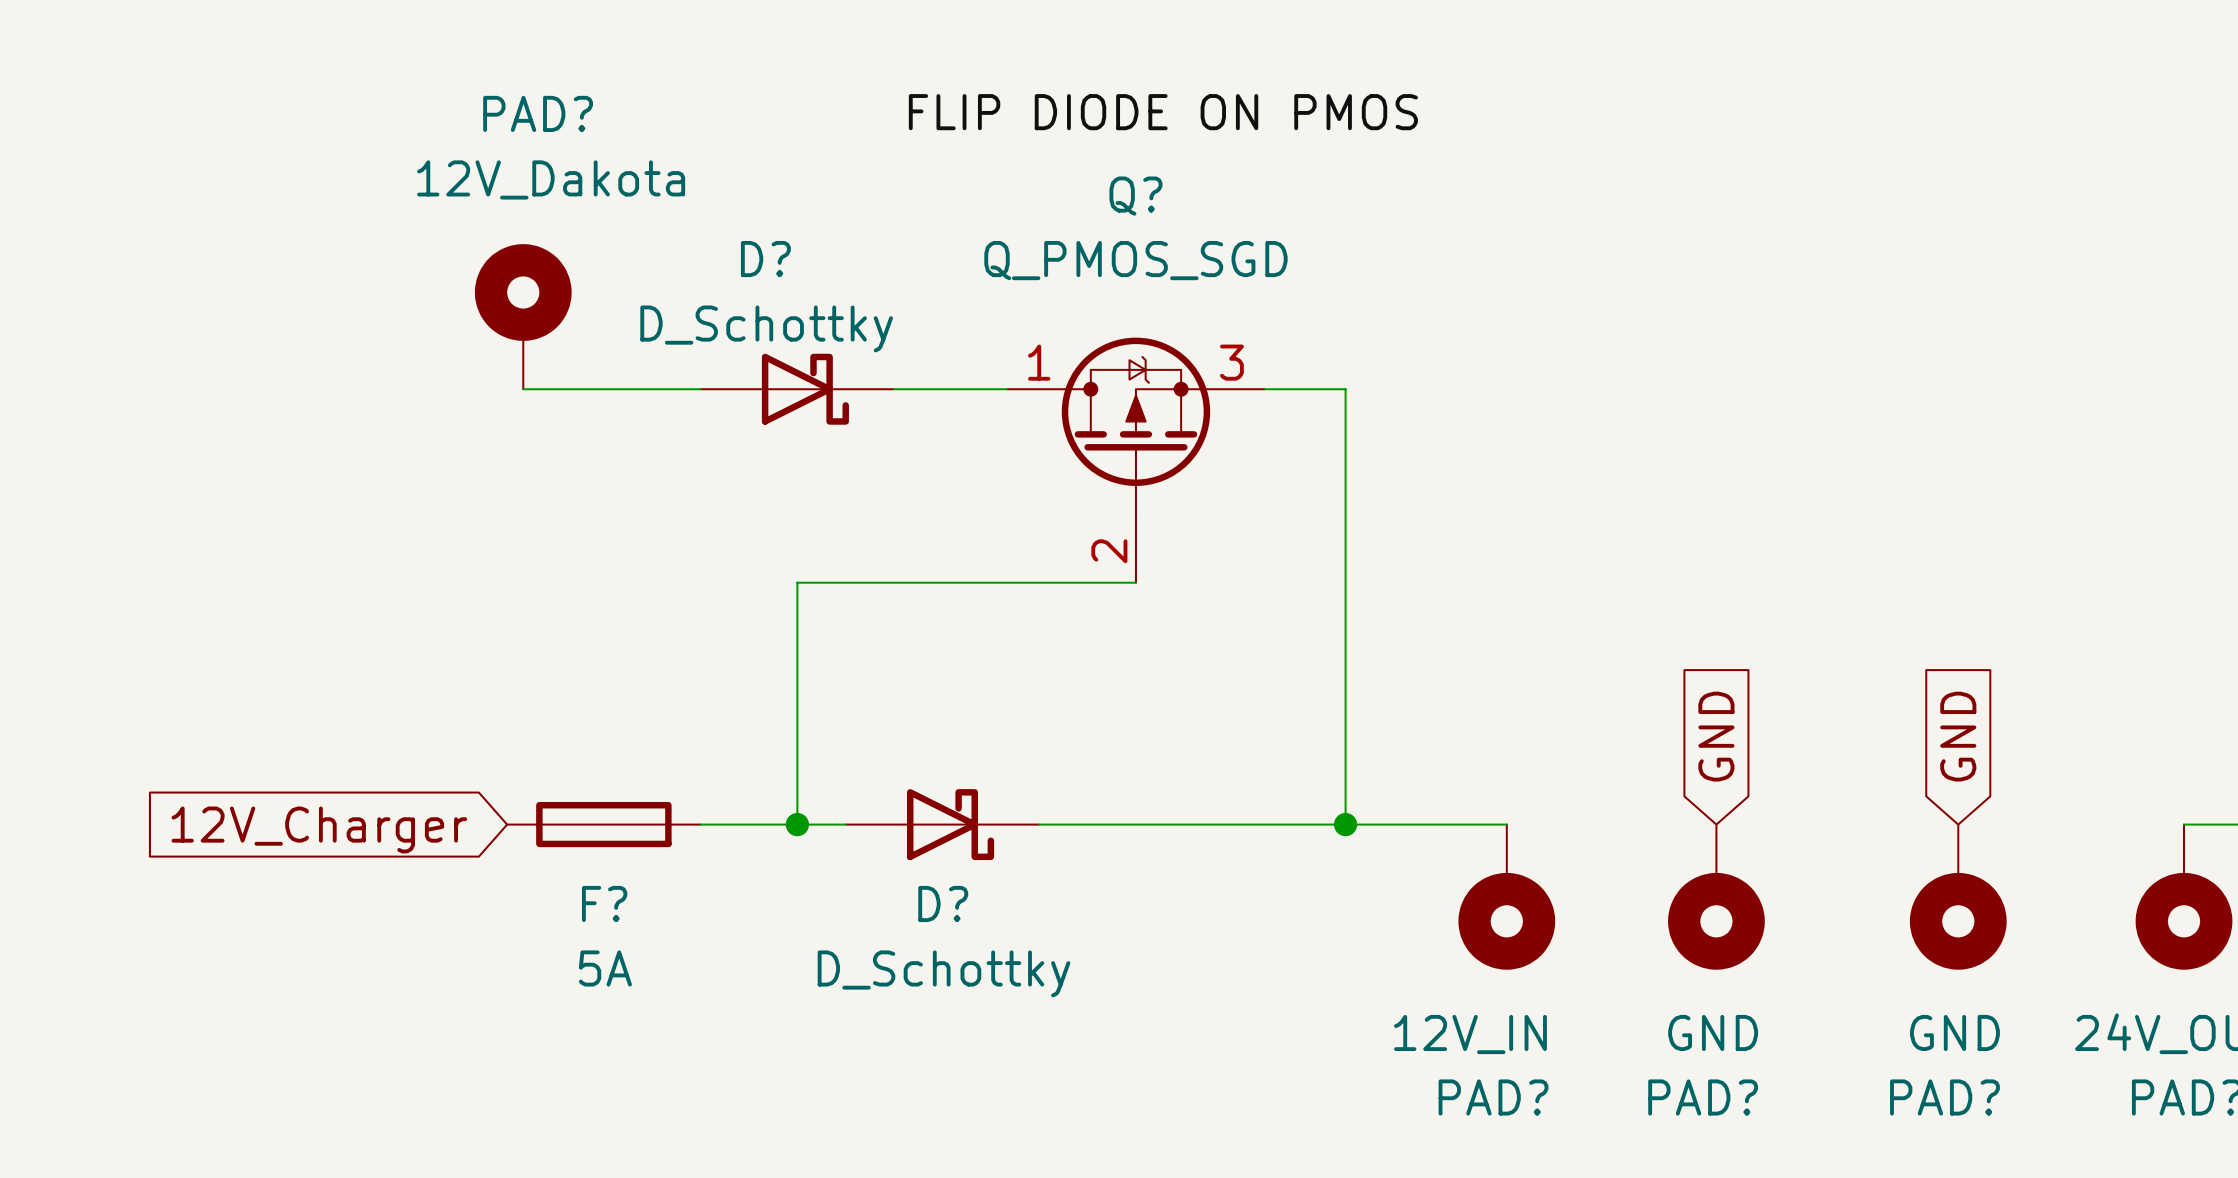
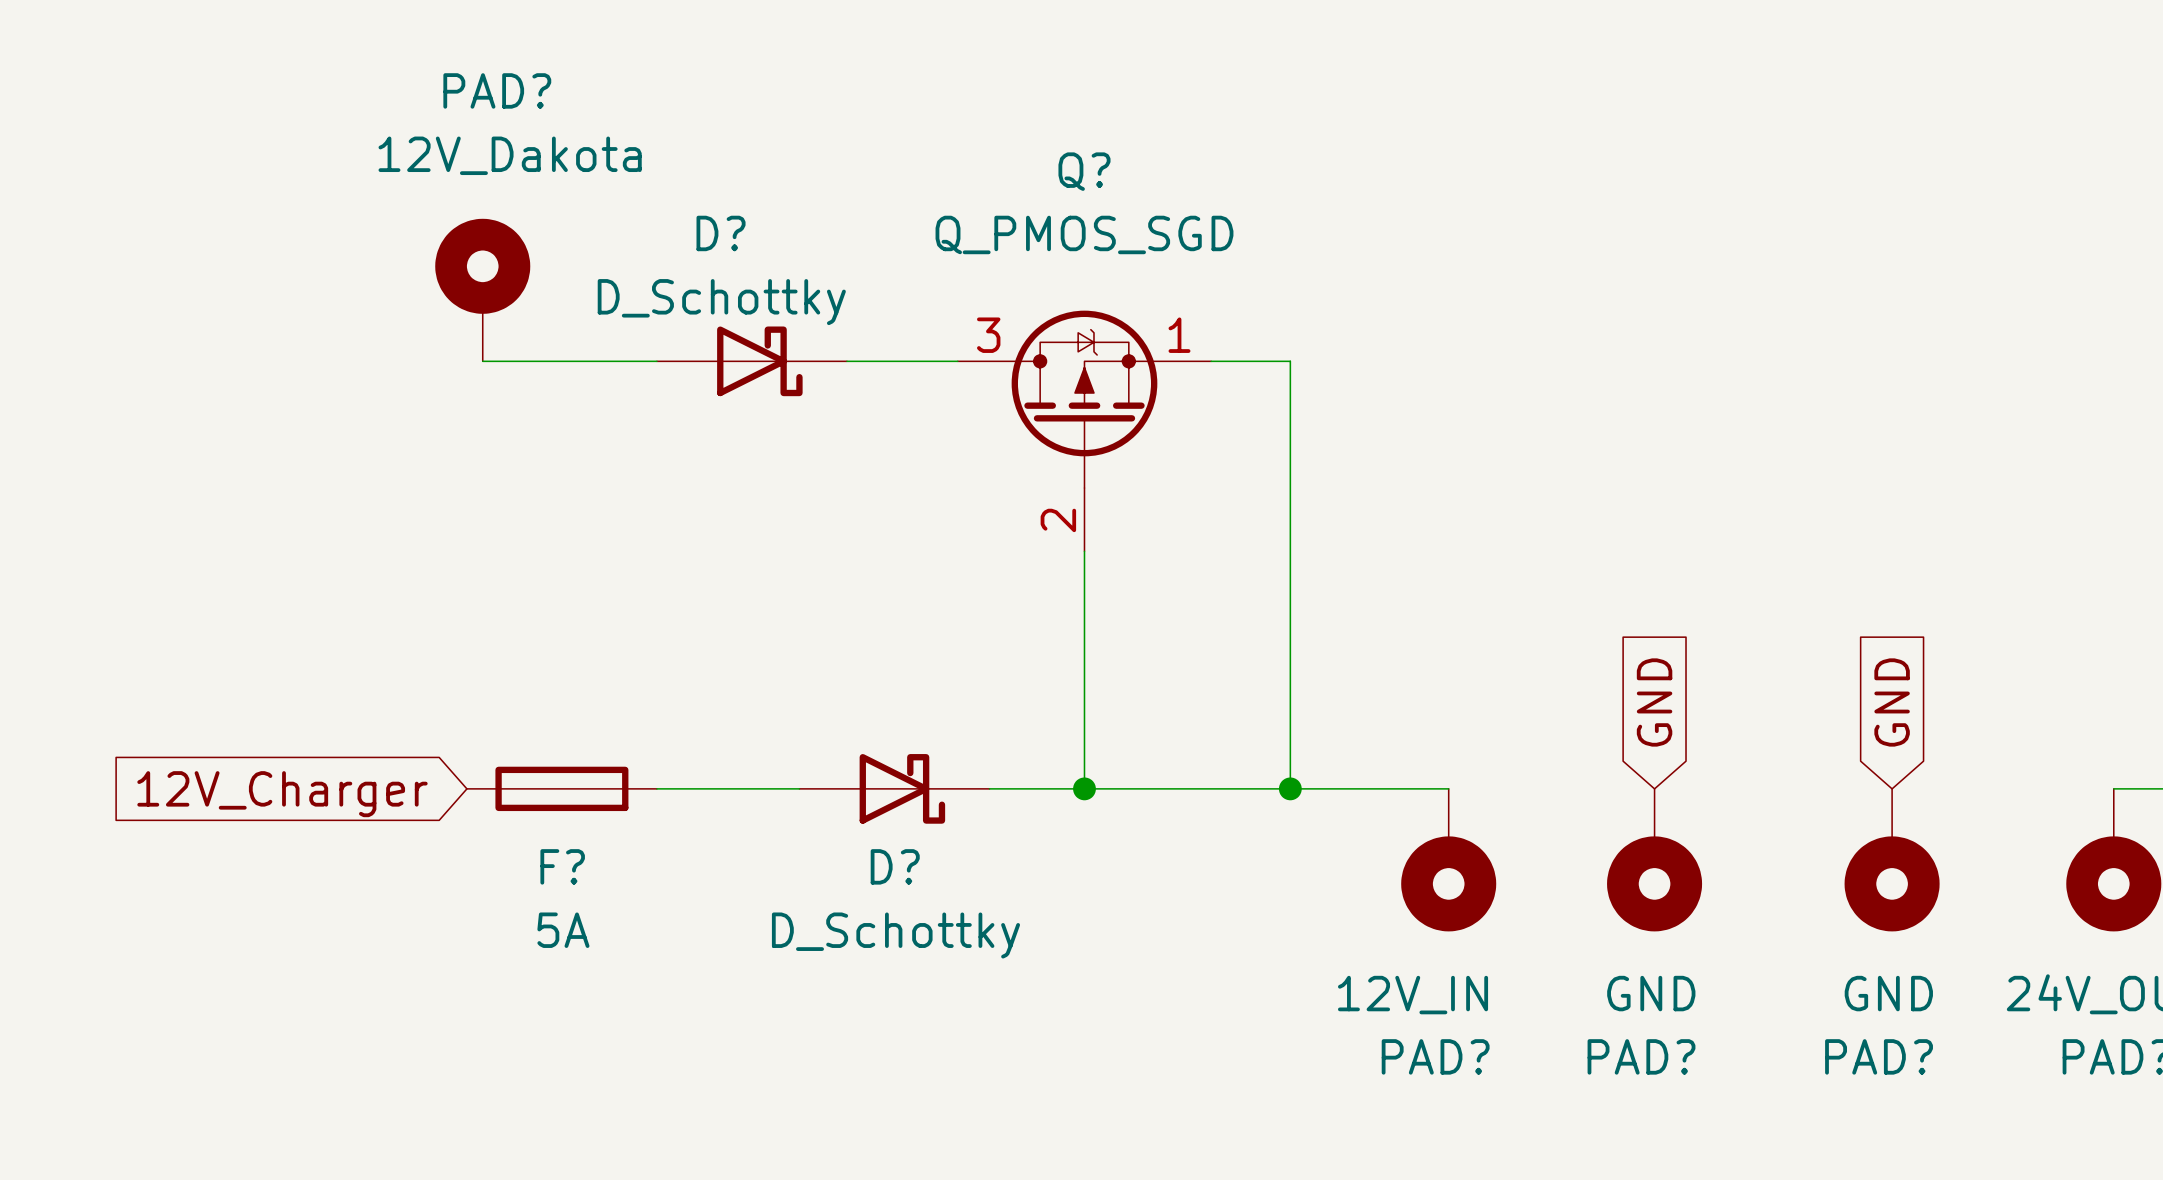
label: FLIP DIODE ON PMOS (1163, 112) -> none
Q? pin number: 1 (1039, 362) -> 3 (988, 335)
Q? pin number: 3 (1231, 362) -> 1 (1179, 335)
wire: (1135, 582) (797, 582) (797, 824) -> (1084, 551) (1084, 788)
junction: (797, 824) -> none
junction: none -> (1084, 788)

